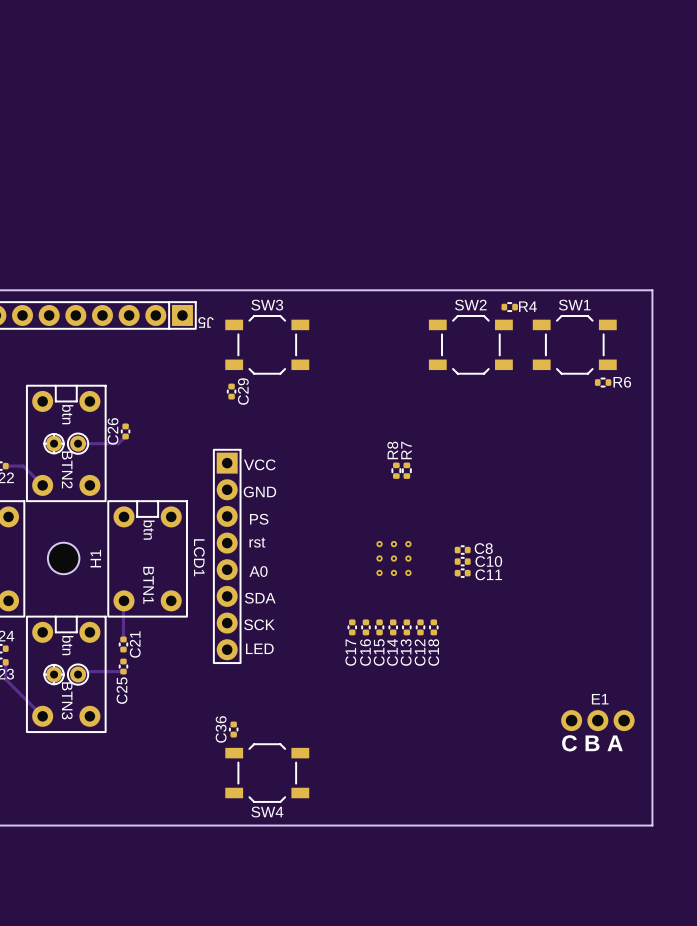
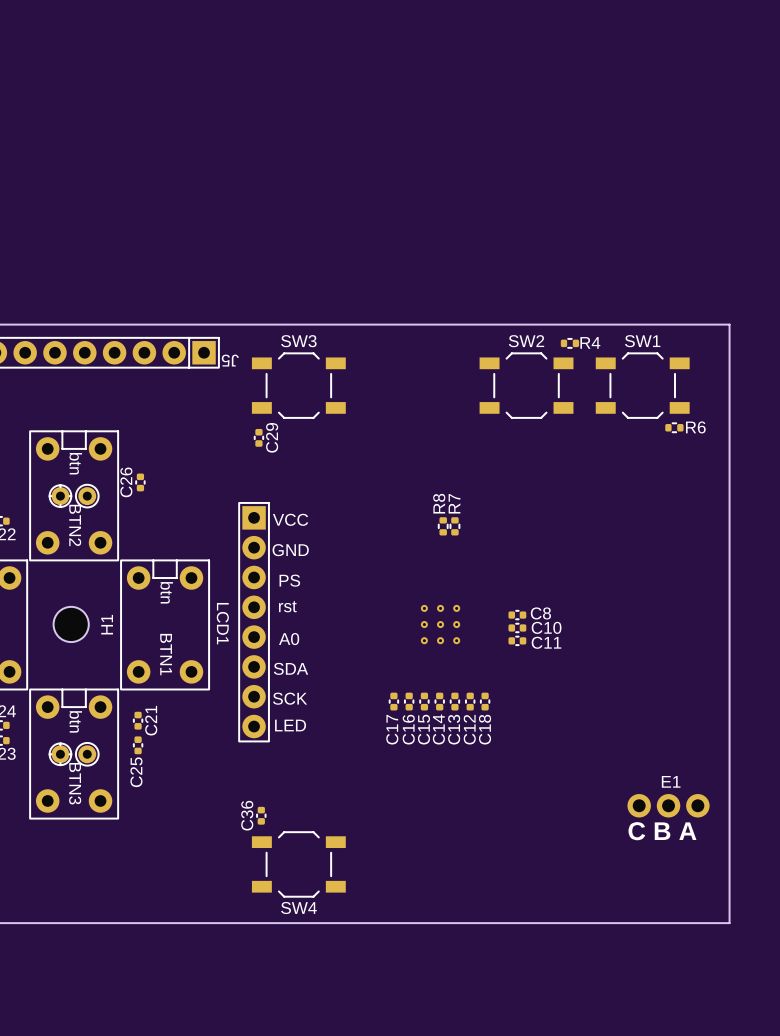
track: (125, 436) (118, 443) (78, 443) -> none
track: (5, 466) (23, 466) (42, 485) -> none
track: (124, 600) (123, 639) -> none
track: (5, 662) (5, 679) (42, 716) -> none
track: (123, 671) (81, 671) (78, 674) -> none

